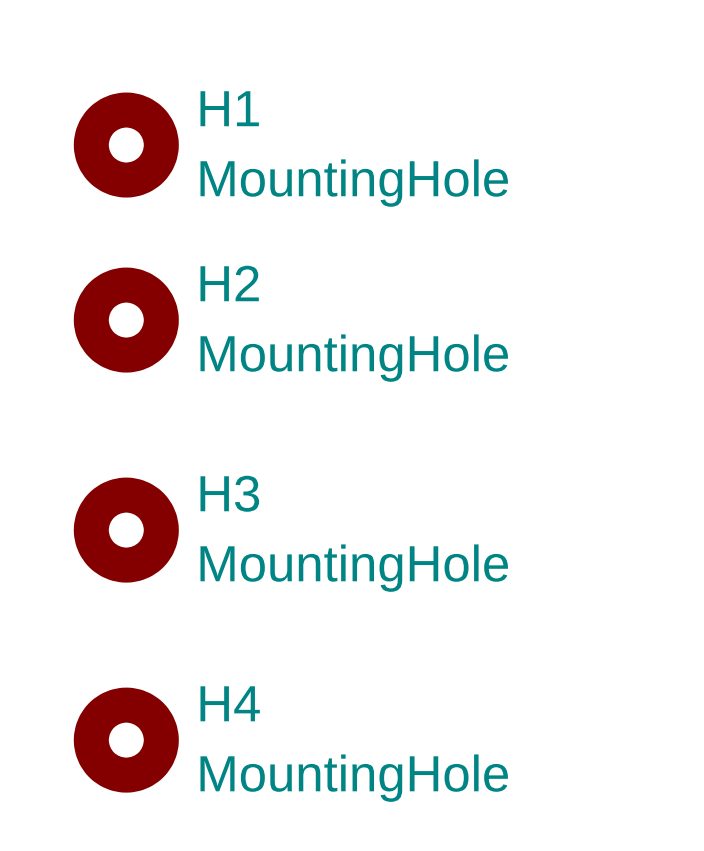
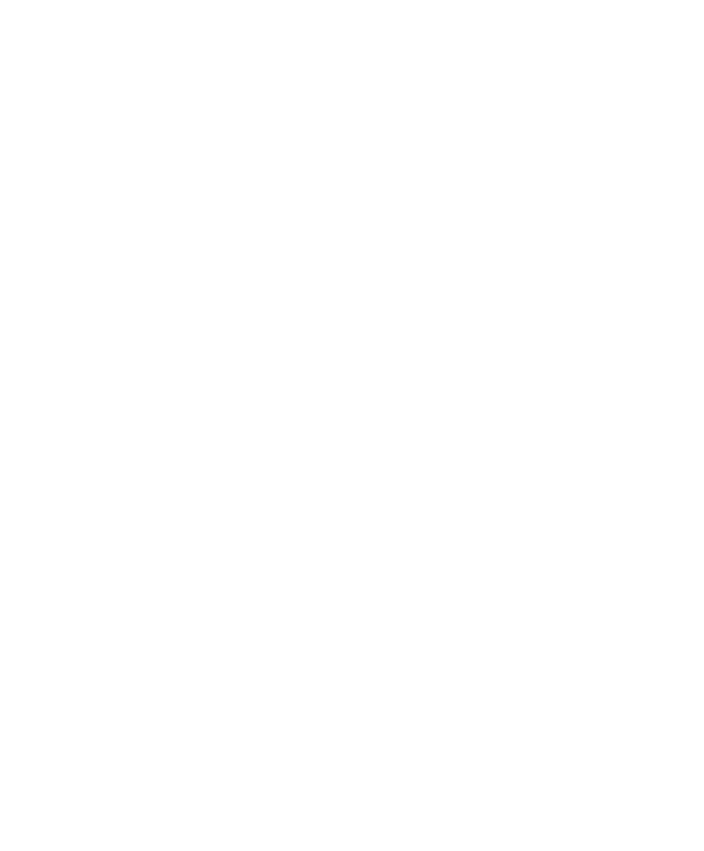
H1: MountingHole (126, 145) -> none
H2: MountingHole (126, 320) -> none
H3: MountingHole (126, 530) -> none
H4: MountingHole (126, 740) -> none

